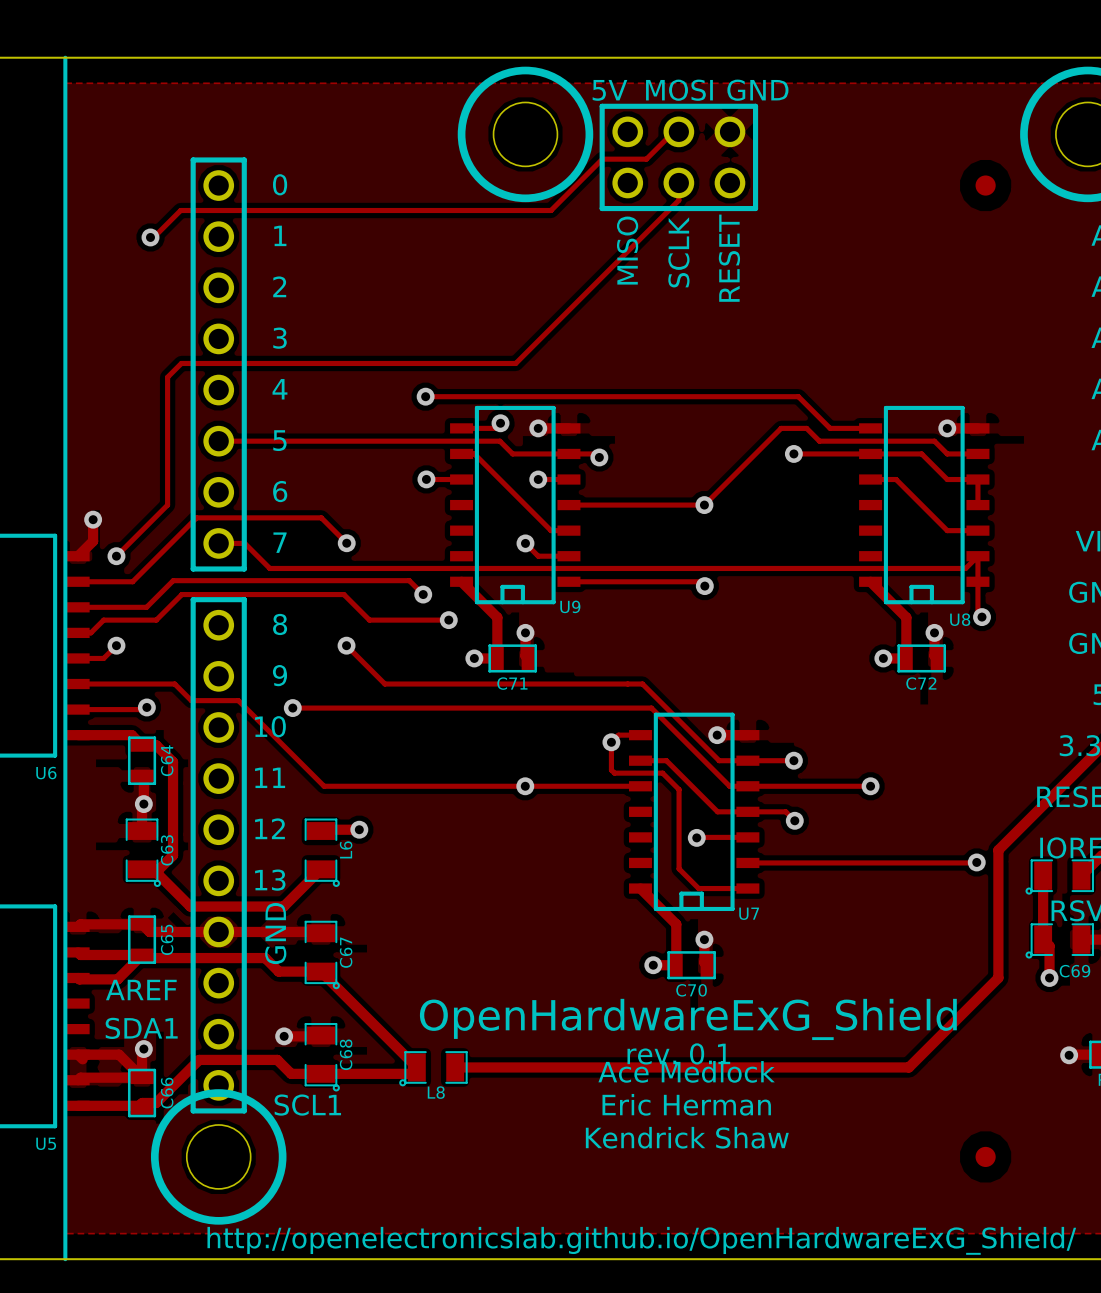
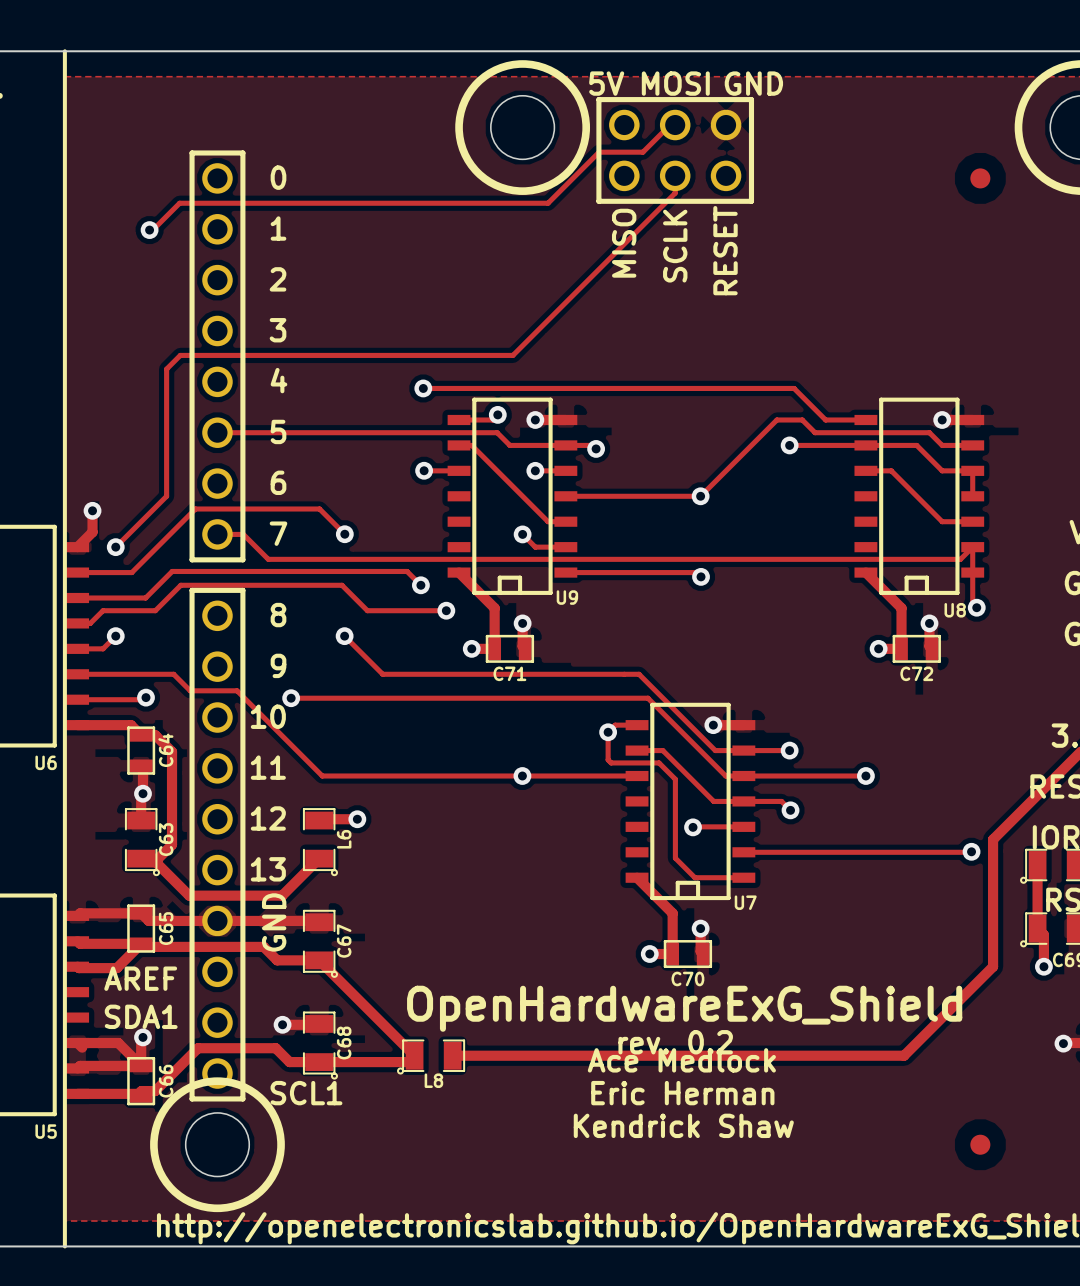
text: rev. 0.1 (678, 1053) -> rev. 0.2 (675, 1042)

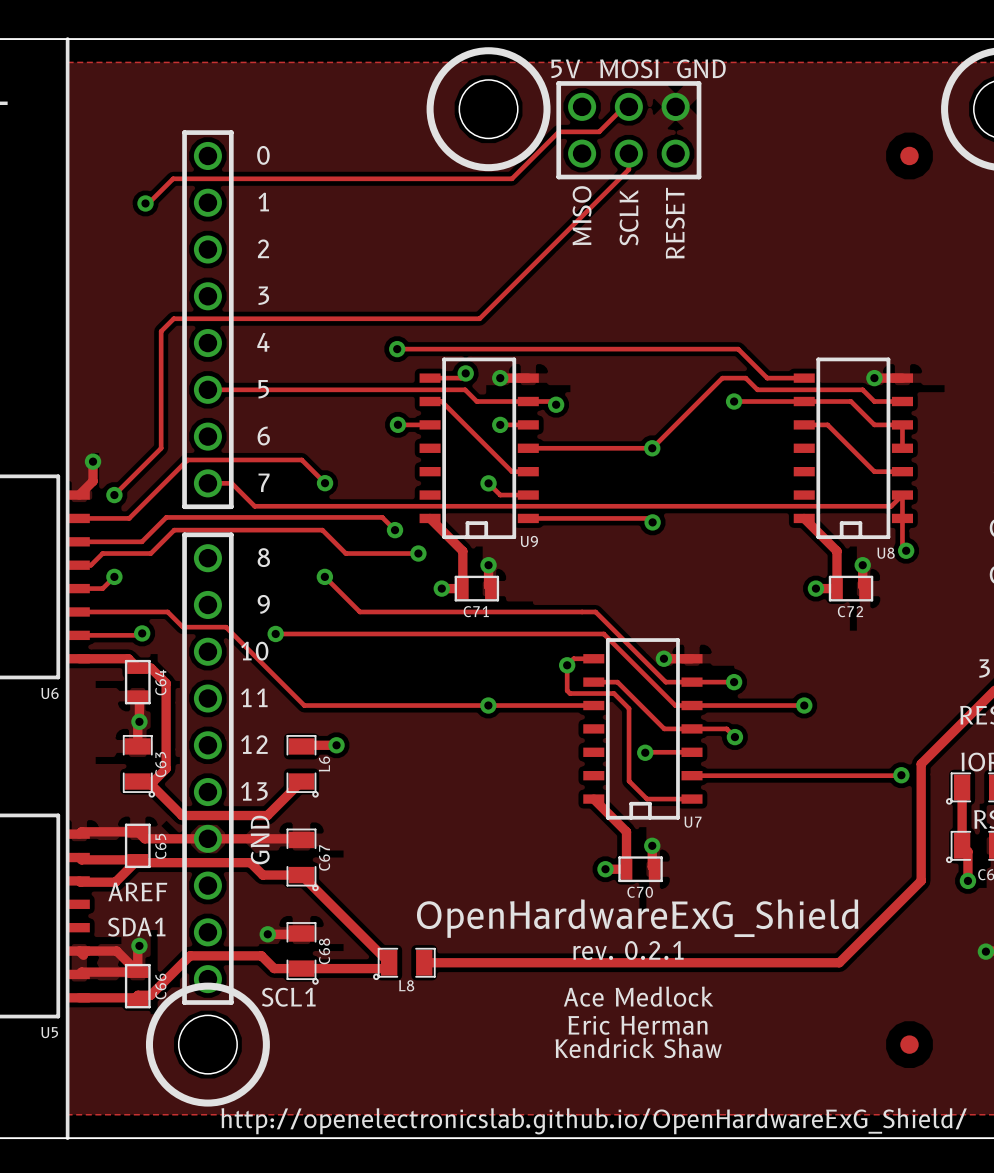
text: rev. 0.2 (675, 1042) -> rev. 0.2.1 (628, 950)
text: Ace Medlock (681, 1060) -> none
text: Eric Herman (682, 1093) -> Ace Medlock (638, 996)
text: Kendrick Shaw (683, 1125) -> Eric Herman (637, 1025)
text: none -> Kendrick Shaw (638, 1048)

